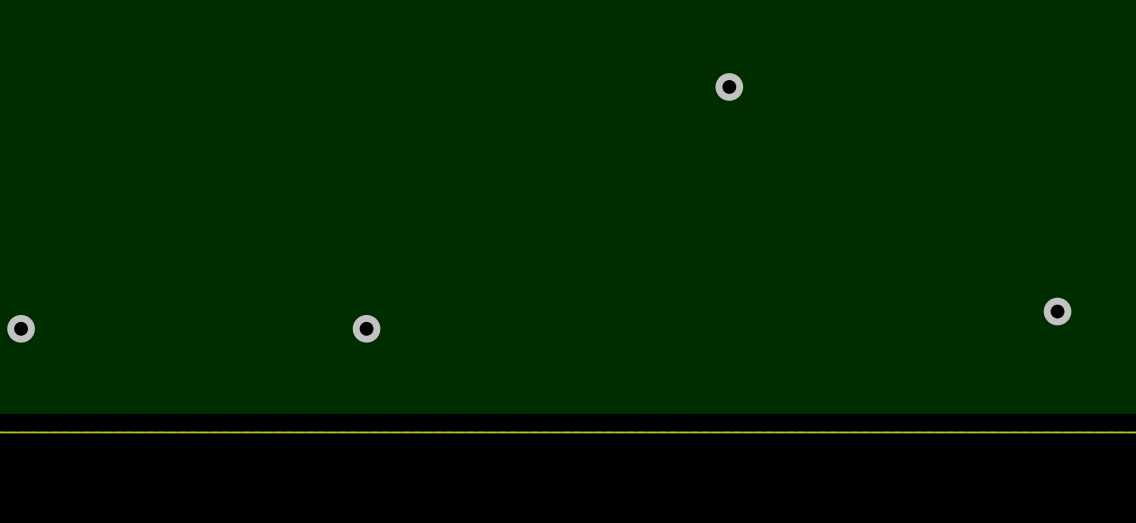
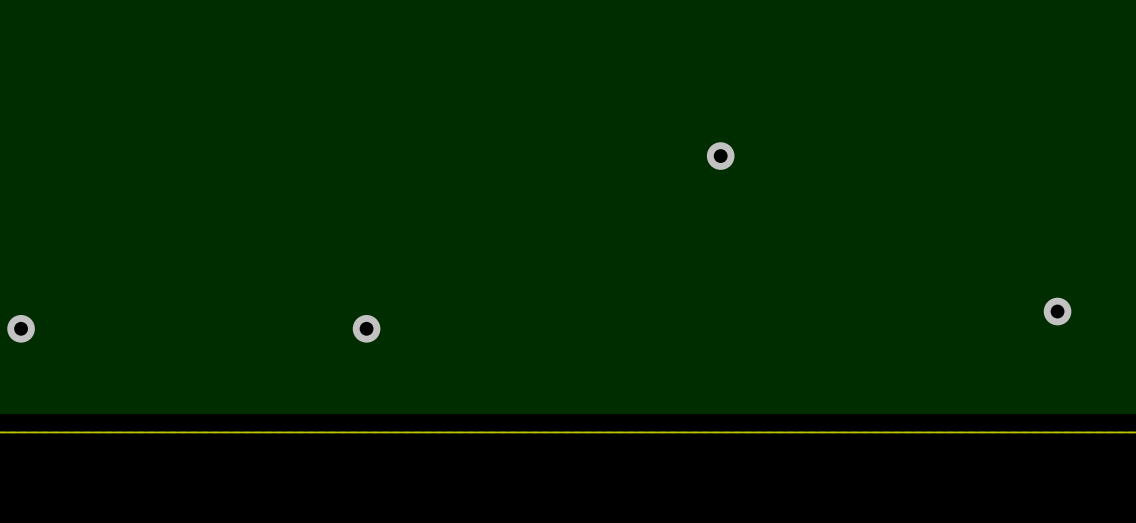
via position: (729, 86) -> (720, 156)

